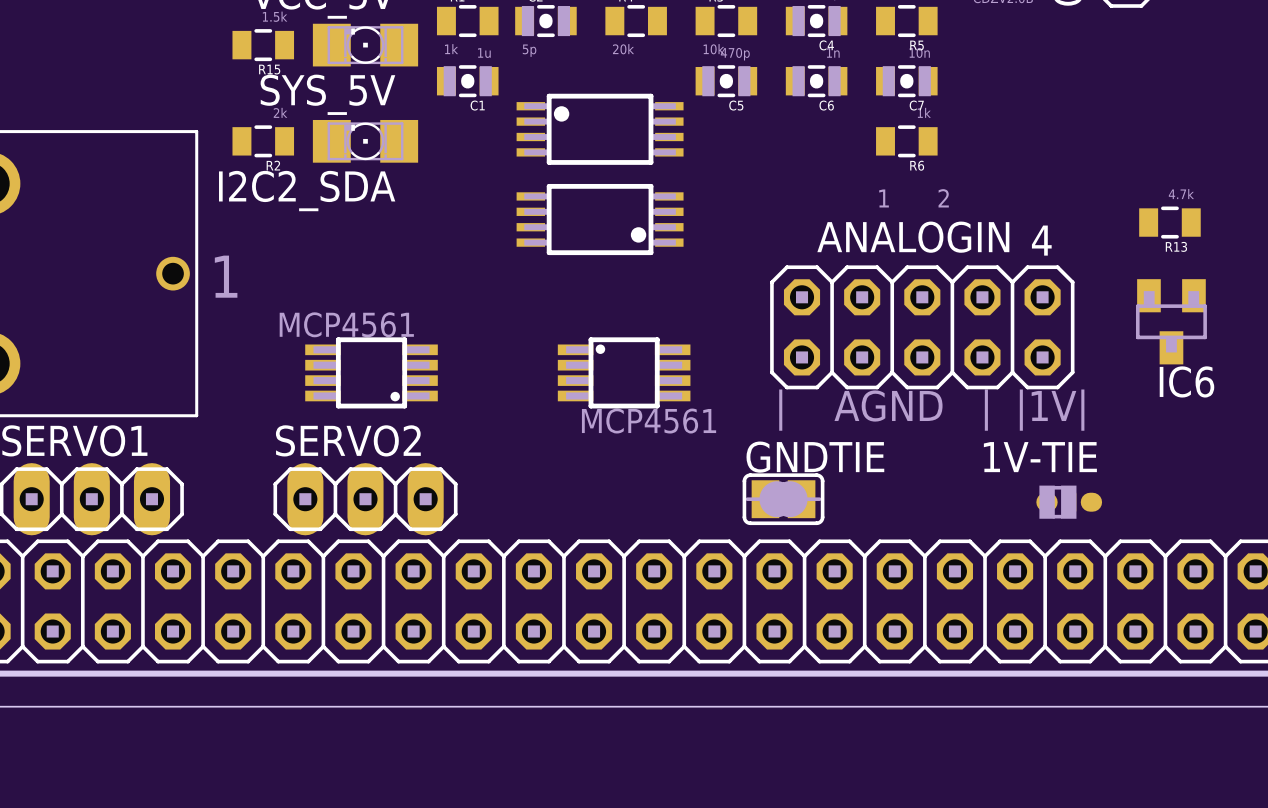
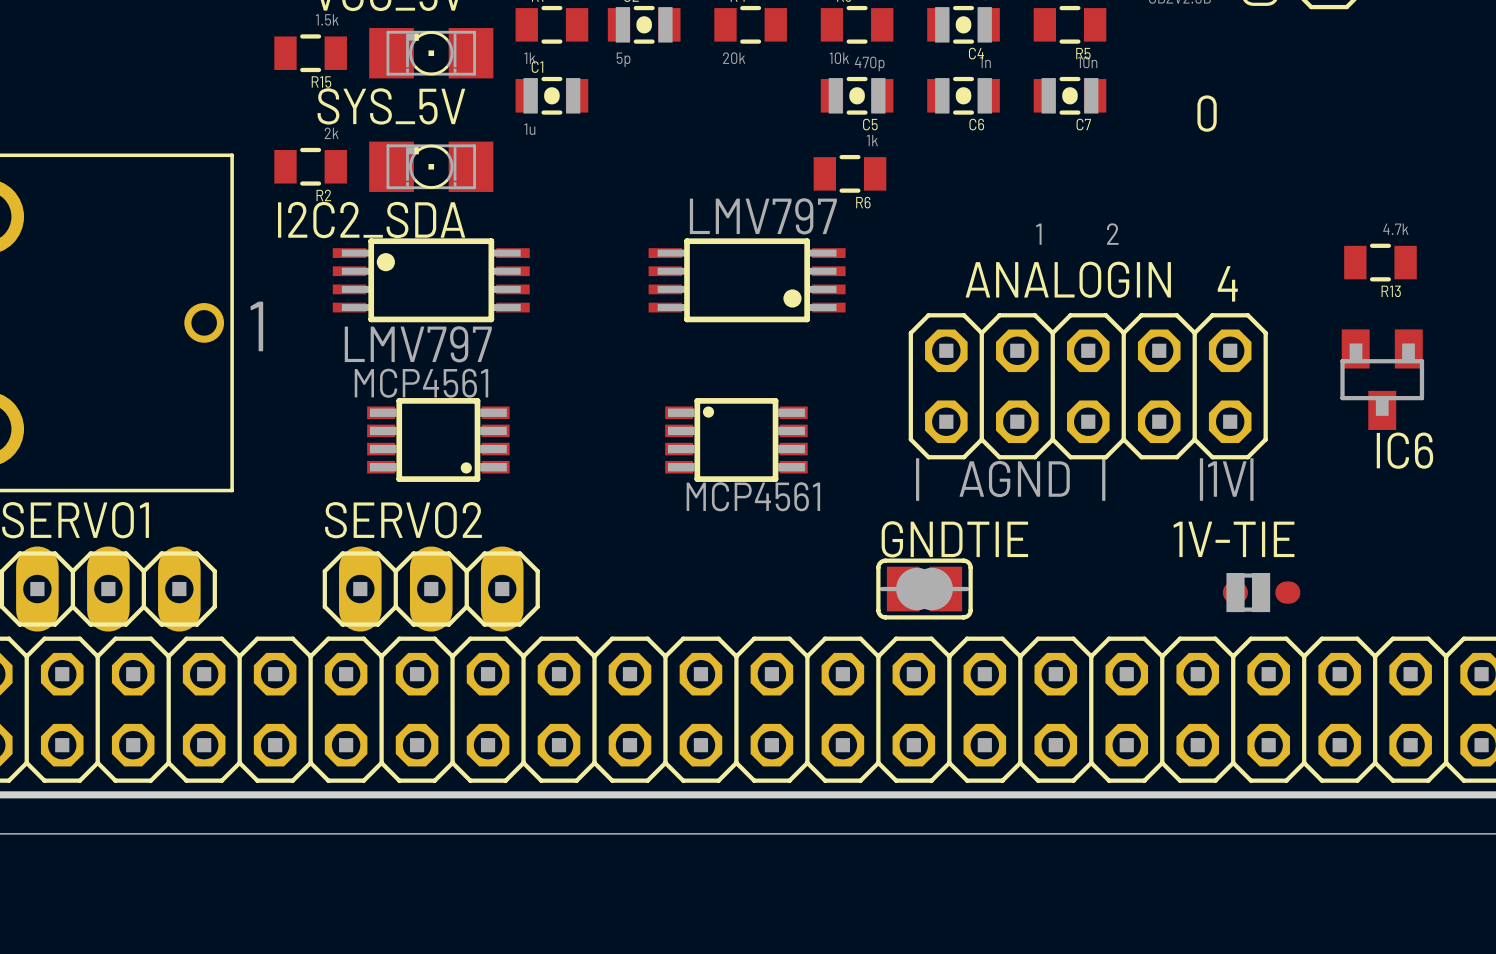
C1 value position: 1u (484, 53) -> 1u (529, 129)
text: none -> 0 (1207, 113)
C1 name position: C1 (477, 105) -> C1 (537, 67)
part: (600, 129) -> none
R6 position: (906, 141) -> (849, 173)
part: (600, 219) -> none
part: none -> LMV797 (431, 280)
part: none -> LMV797 (747, 280)
part footprint: [305, 337, 438, 409] -> [367, 398, 510, 482]
part footprint: [557, 337, 691, 409] -> [665, 398, 808, 482]

